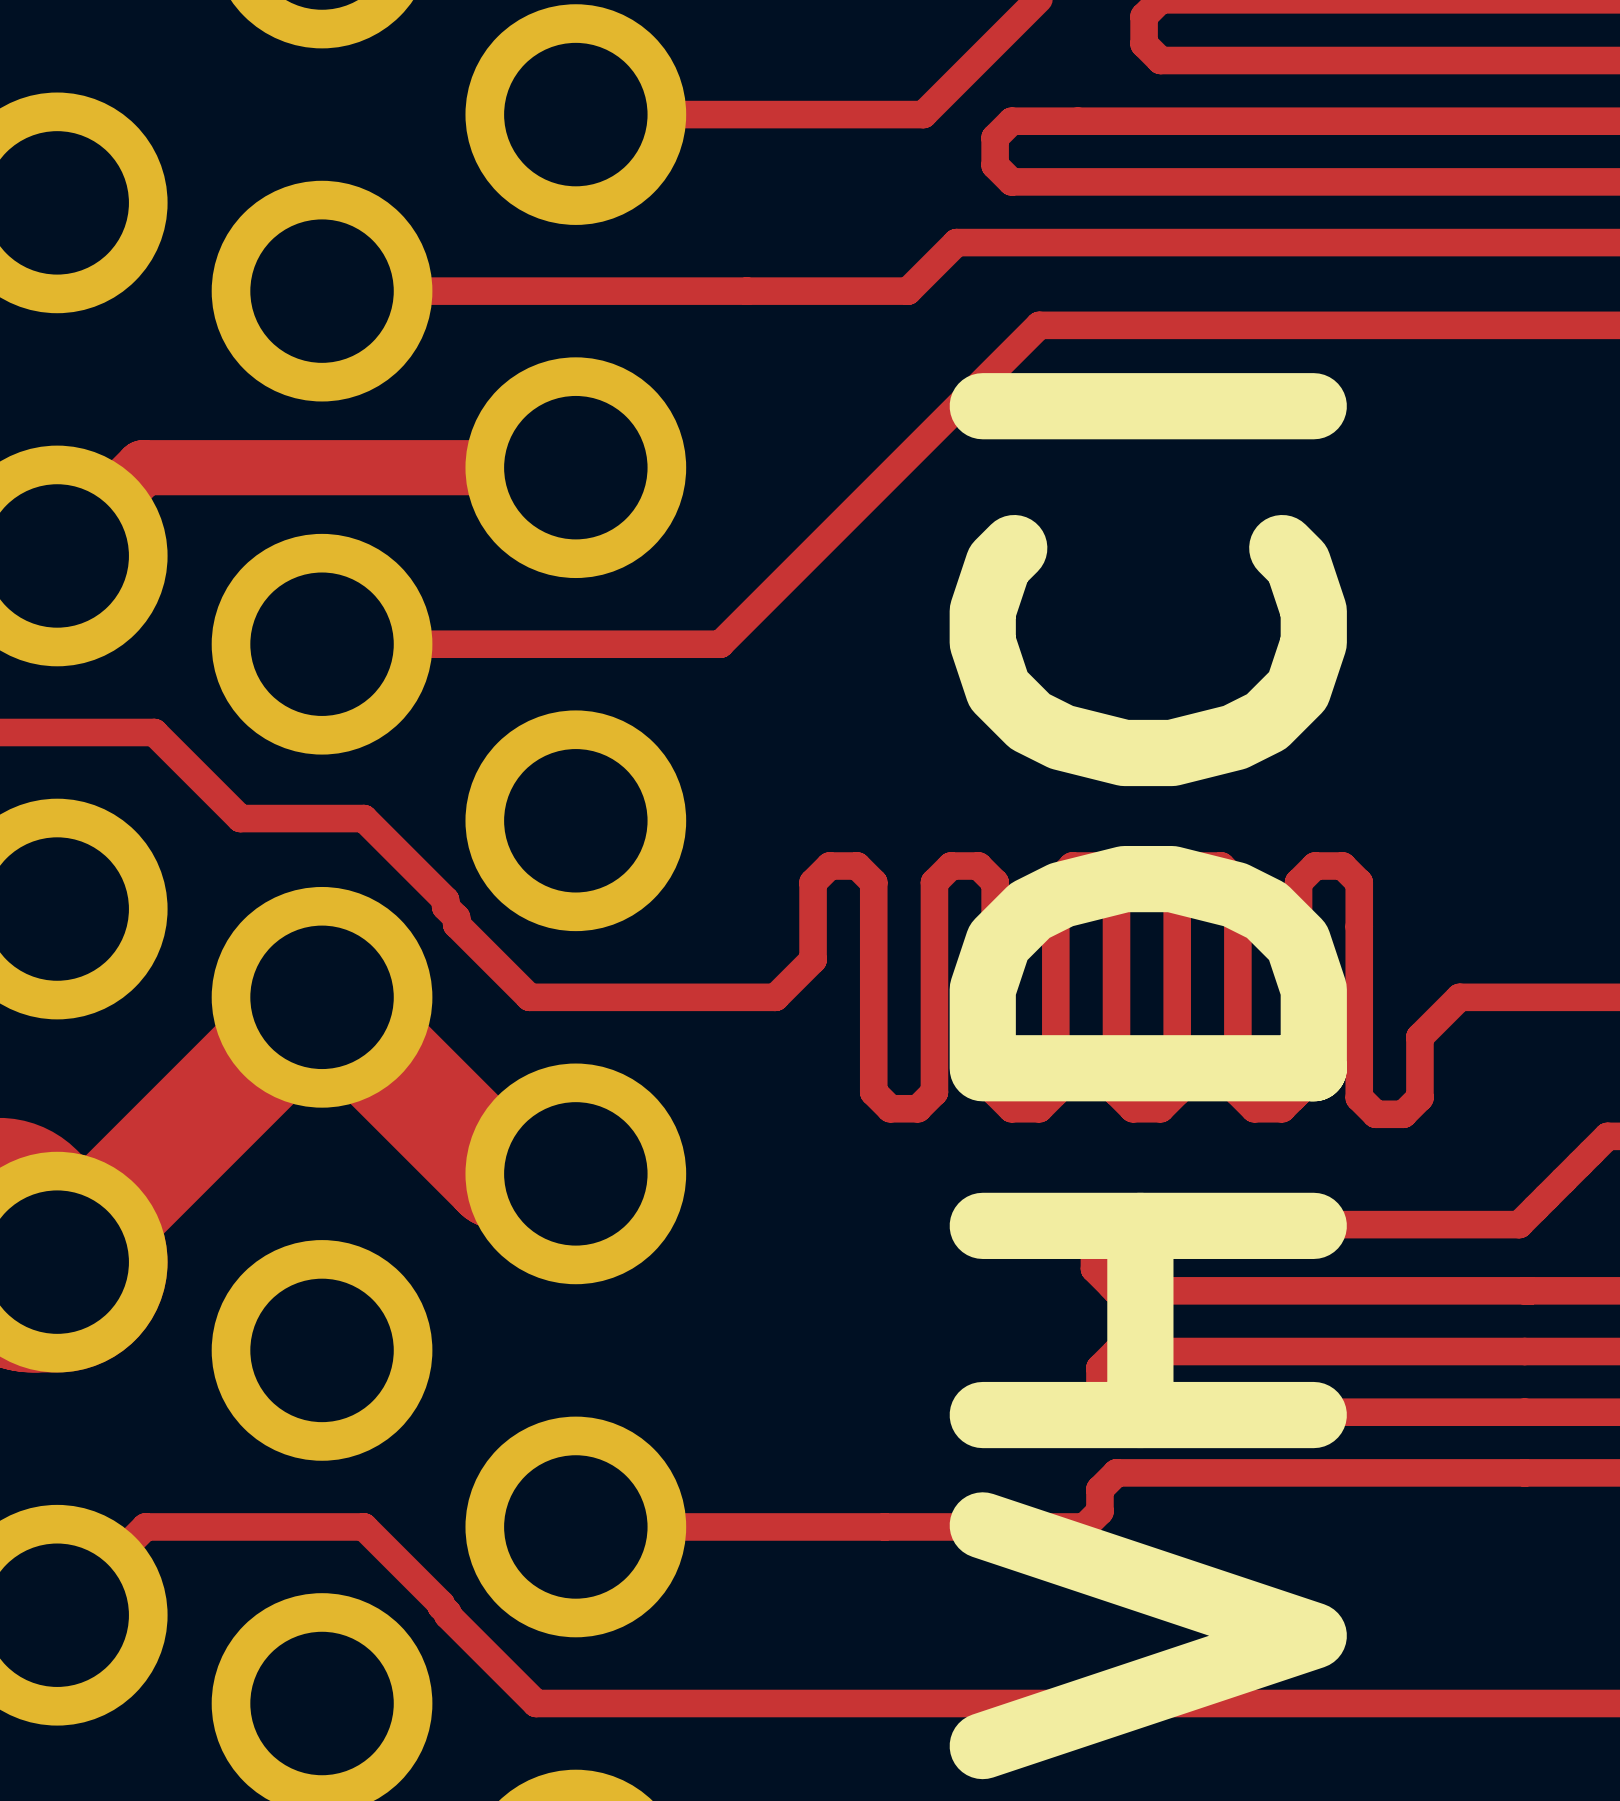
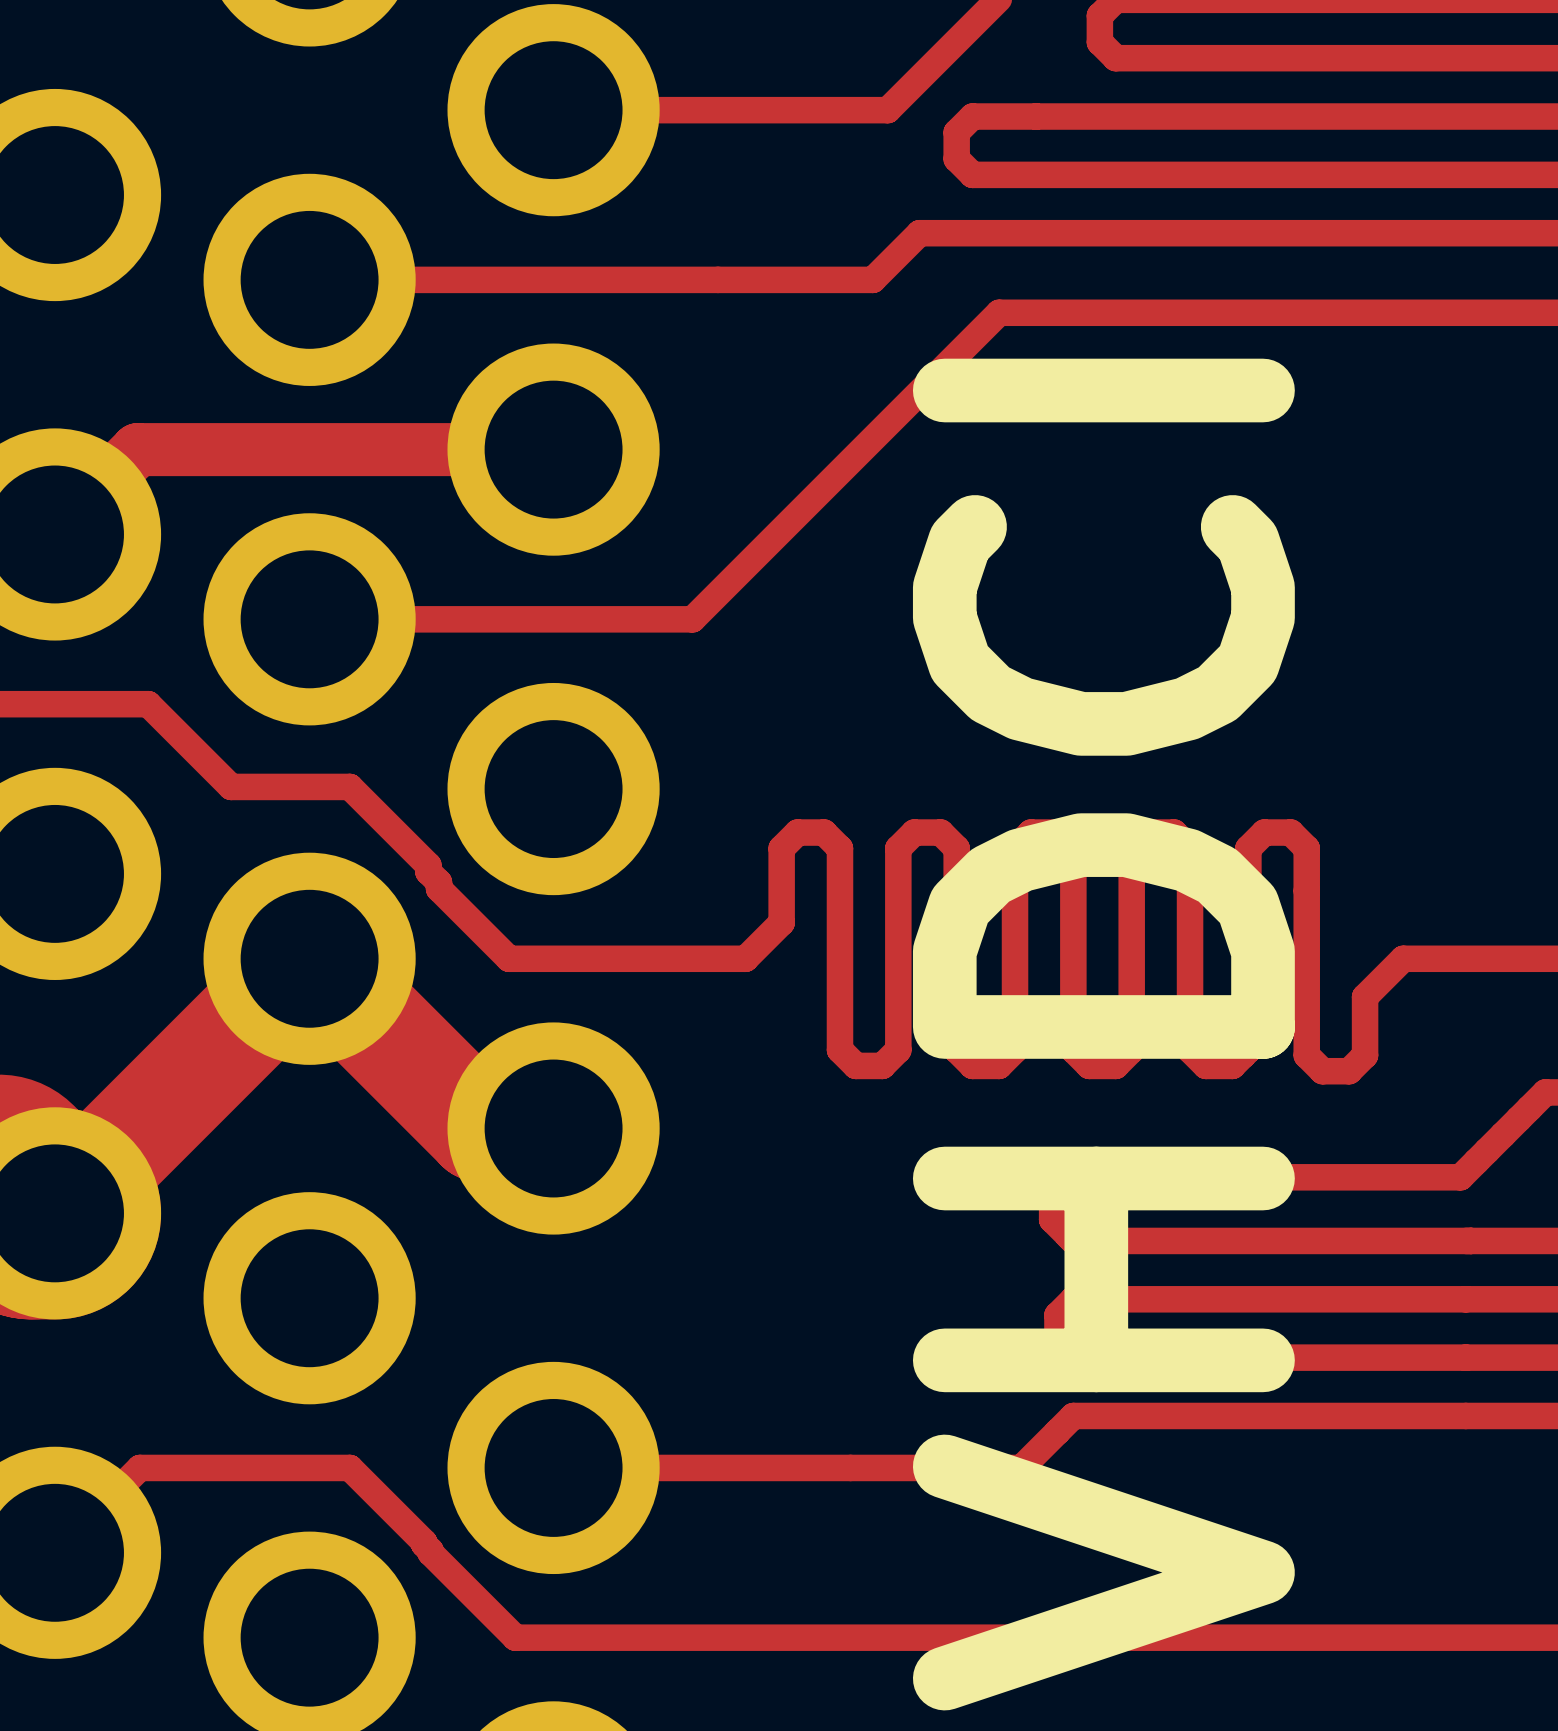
track: (1099, 1489) (1099, 1511) (1084, 1526) (1062, 1526) -> (1057, 1431) (1021, 1467)

